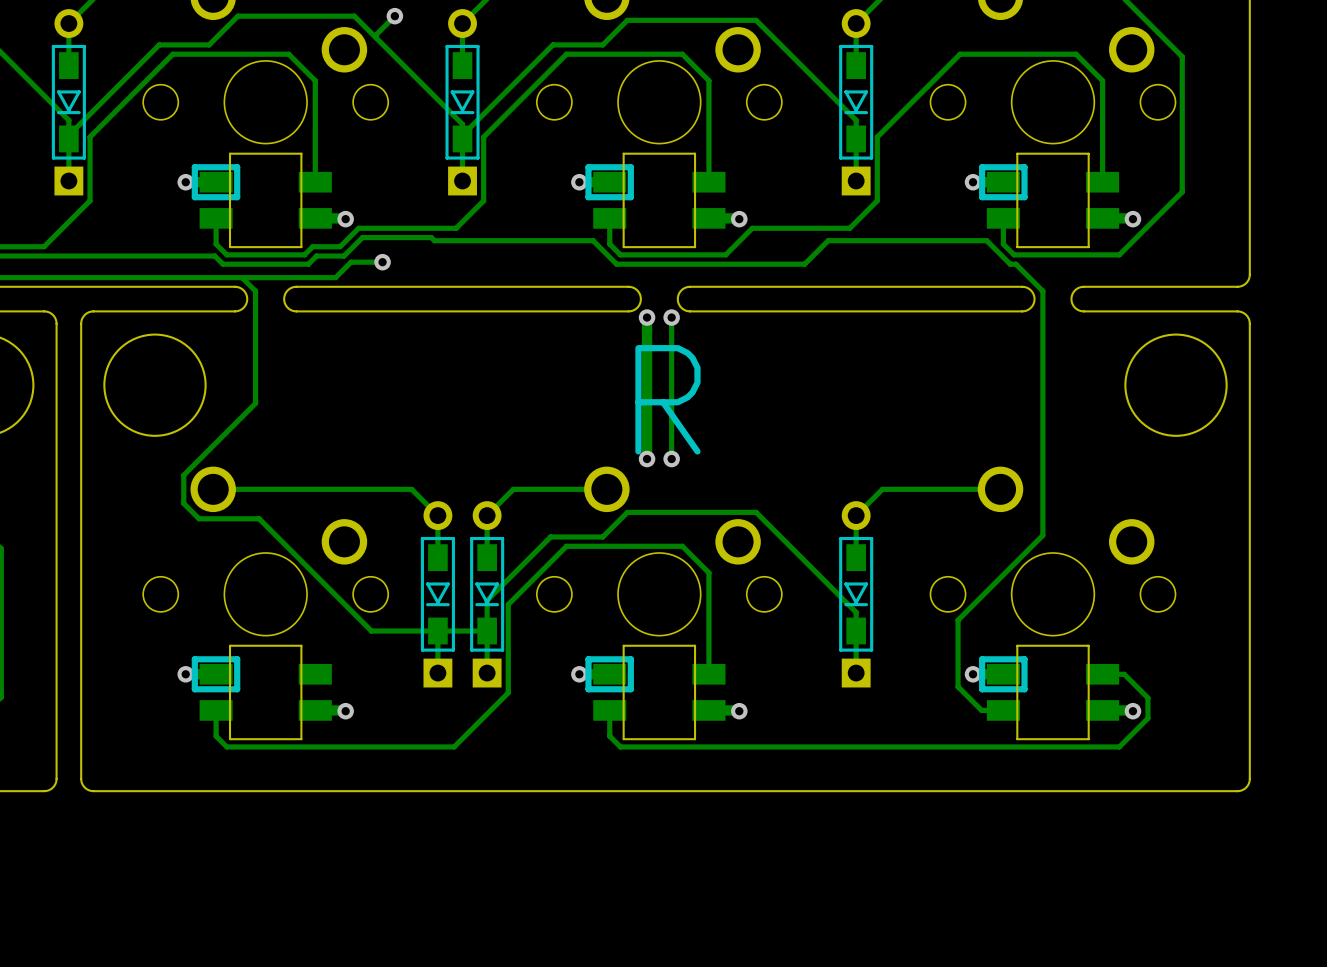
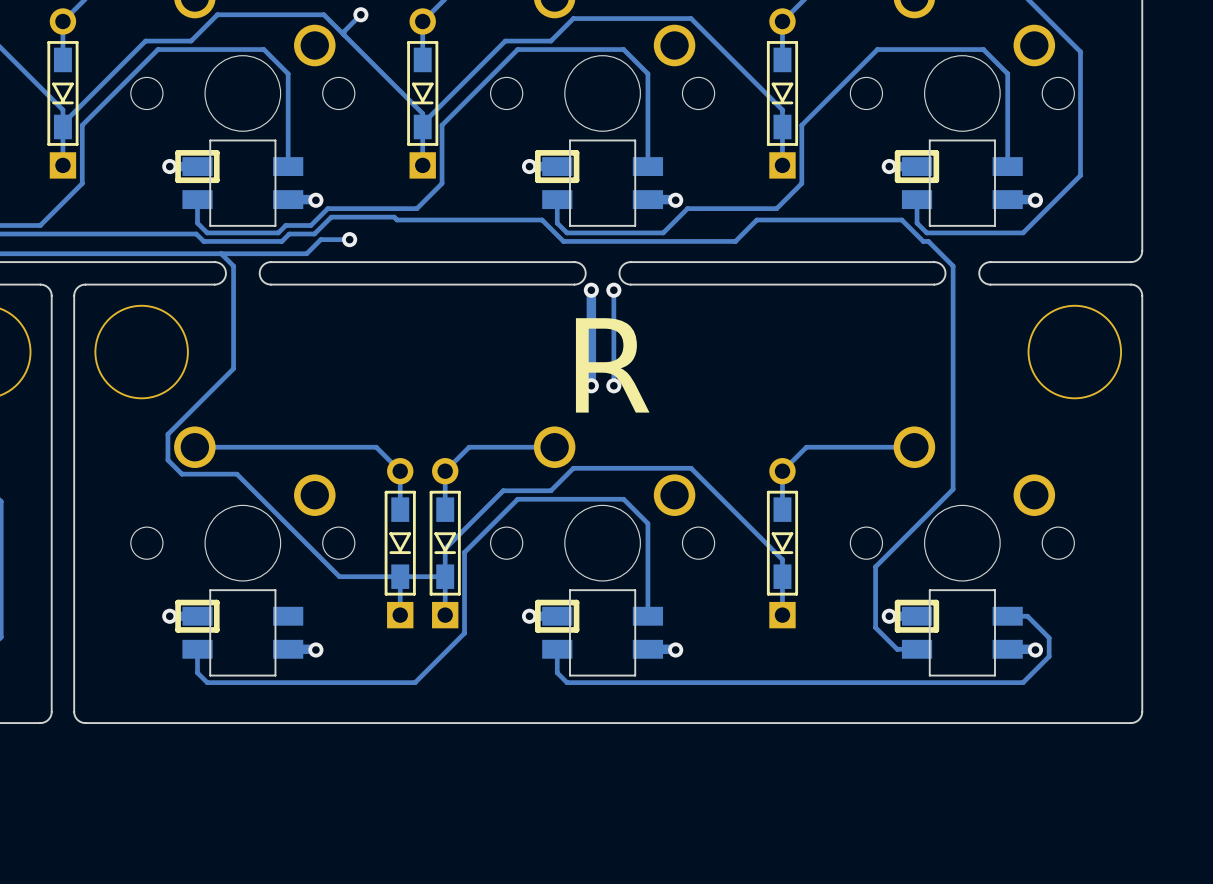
track: (647, 422) (647, 459) -> none
via: none -> (591, 385)
track: (671, 422) (671, 459) -> none
via: none -> (613, 385)
via: (647, 459) -> none
via: (671, 459) -> none

